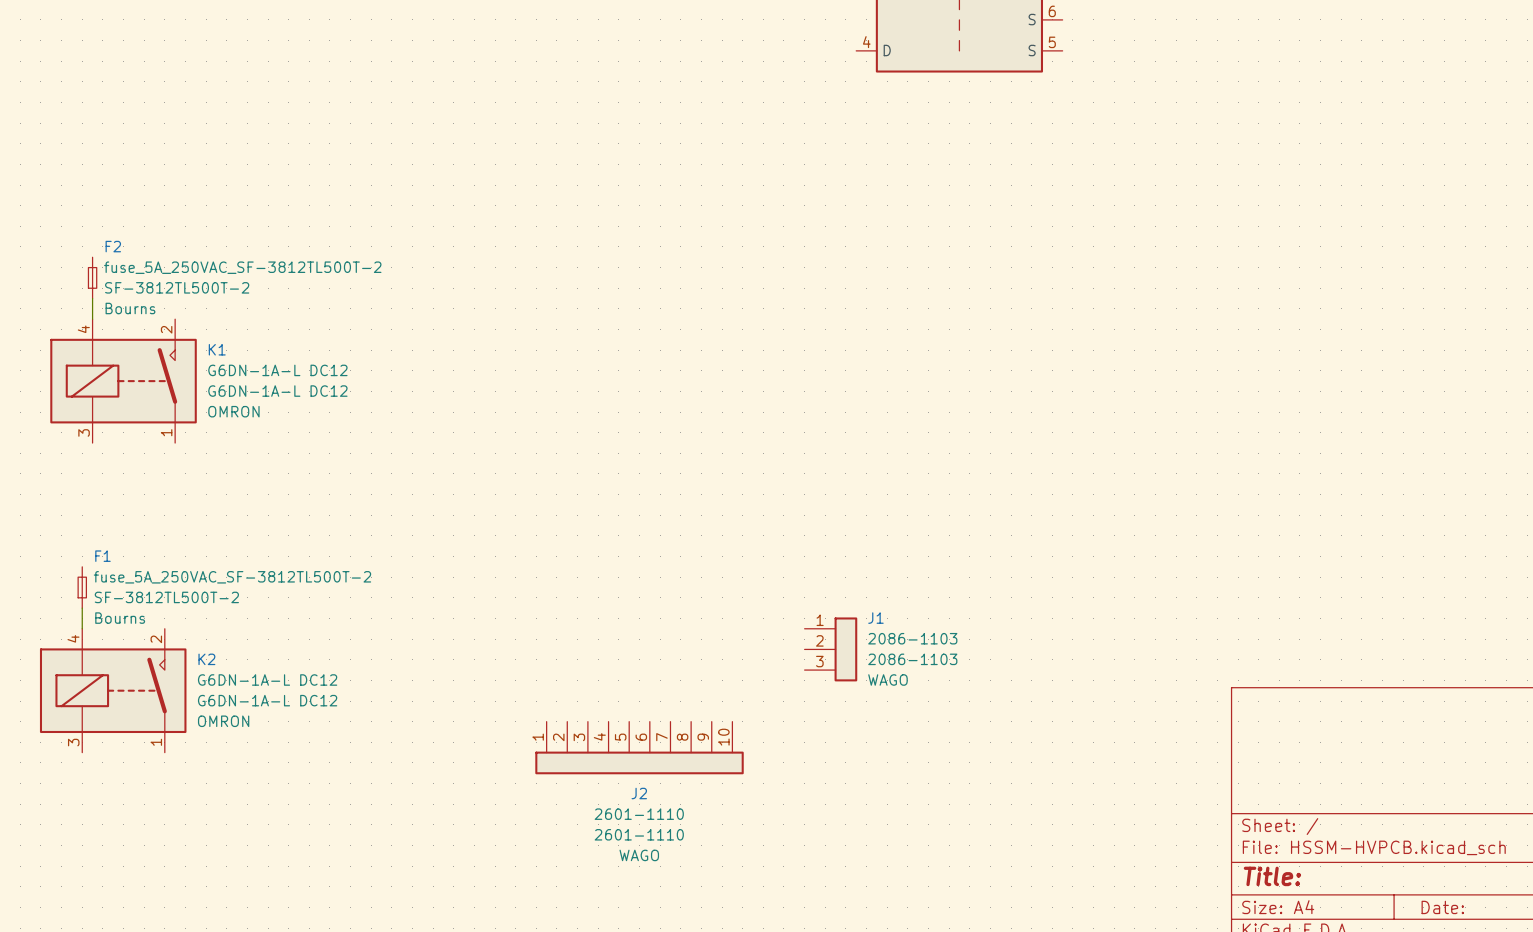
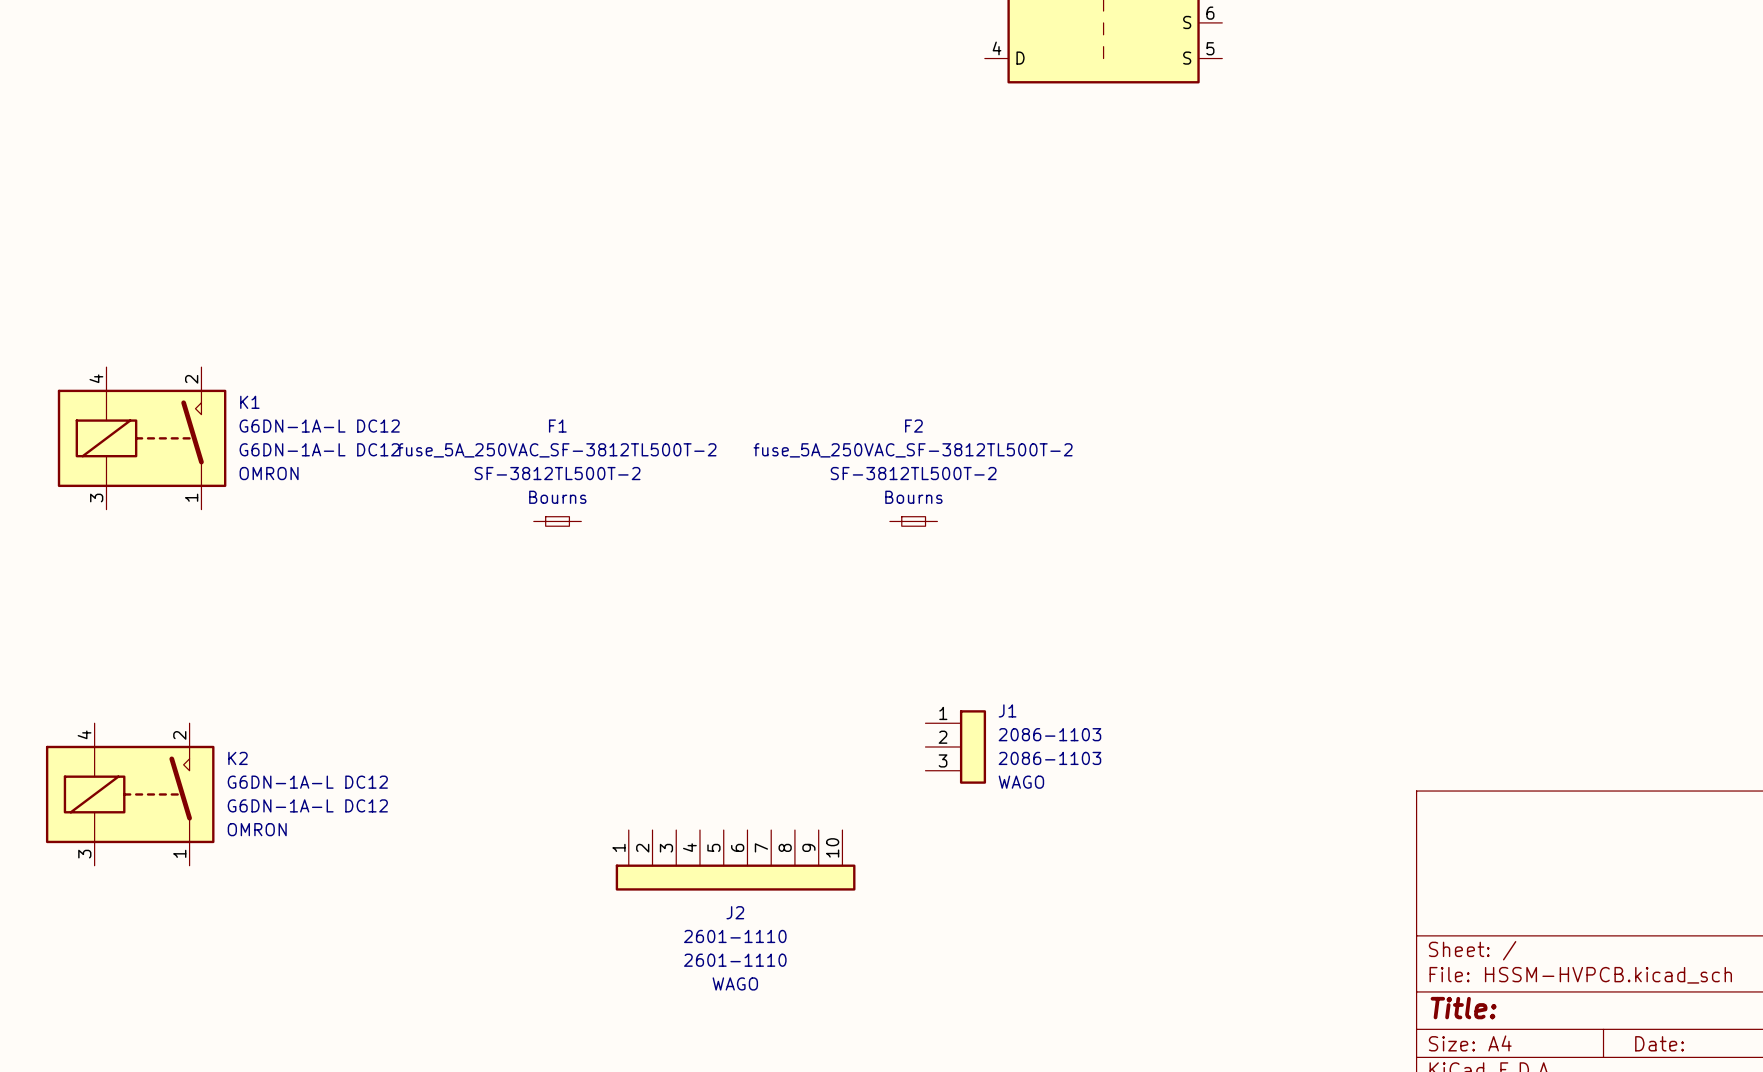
F2 name position: F2 (113, 246) -> F2 (913, 426)
F2 value position: fuse_5A_250VAC_SF-3812TL500T-2 (242, 267) -> fuse_5A_250VAC_SF-3812TL500T-2 (913, 450)
F2 rotation: 0° (92, 277) -> 90° clockwise (913, 521)
F2 position: (92, 277) -> (913, 521)
F2 text position: SF-3812TL500T-2 (177, 287) -> SF-3812TL500T-2 (913, 473)
wire: (92, 298) (92, 319) -> none
F2 text position: Bourns (130, 308) -> Bourns (913, 497)
F1 name position: F1 (102, 556) -> F1 (557, 426)
F1 value position: fuse_5A_250VAC_SF-3812TL500T-2 (232, 577) -> fuse_5A_250VAC_SF-3812TL500T-2 (556, 450)
F1 rotation: 0° (82, 587) -> 90° clockwise (557, 521)
F1 position: (82, 587) -> (557, 521)
F1 text position: SF-3812TL500T-2 (166, 597) -> SF-3812TL500T-2 (557, 473)
wire: (82, 608) (82, 628) -> none
F1 text position: Bourns (120, 618) -> Bourns (557, 497)

